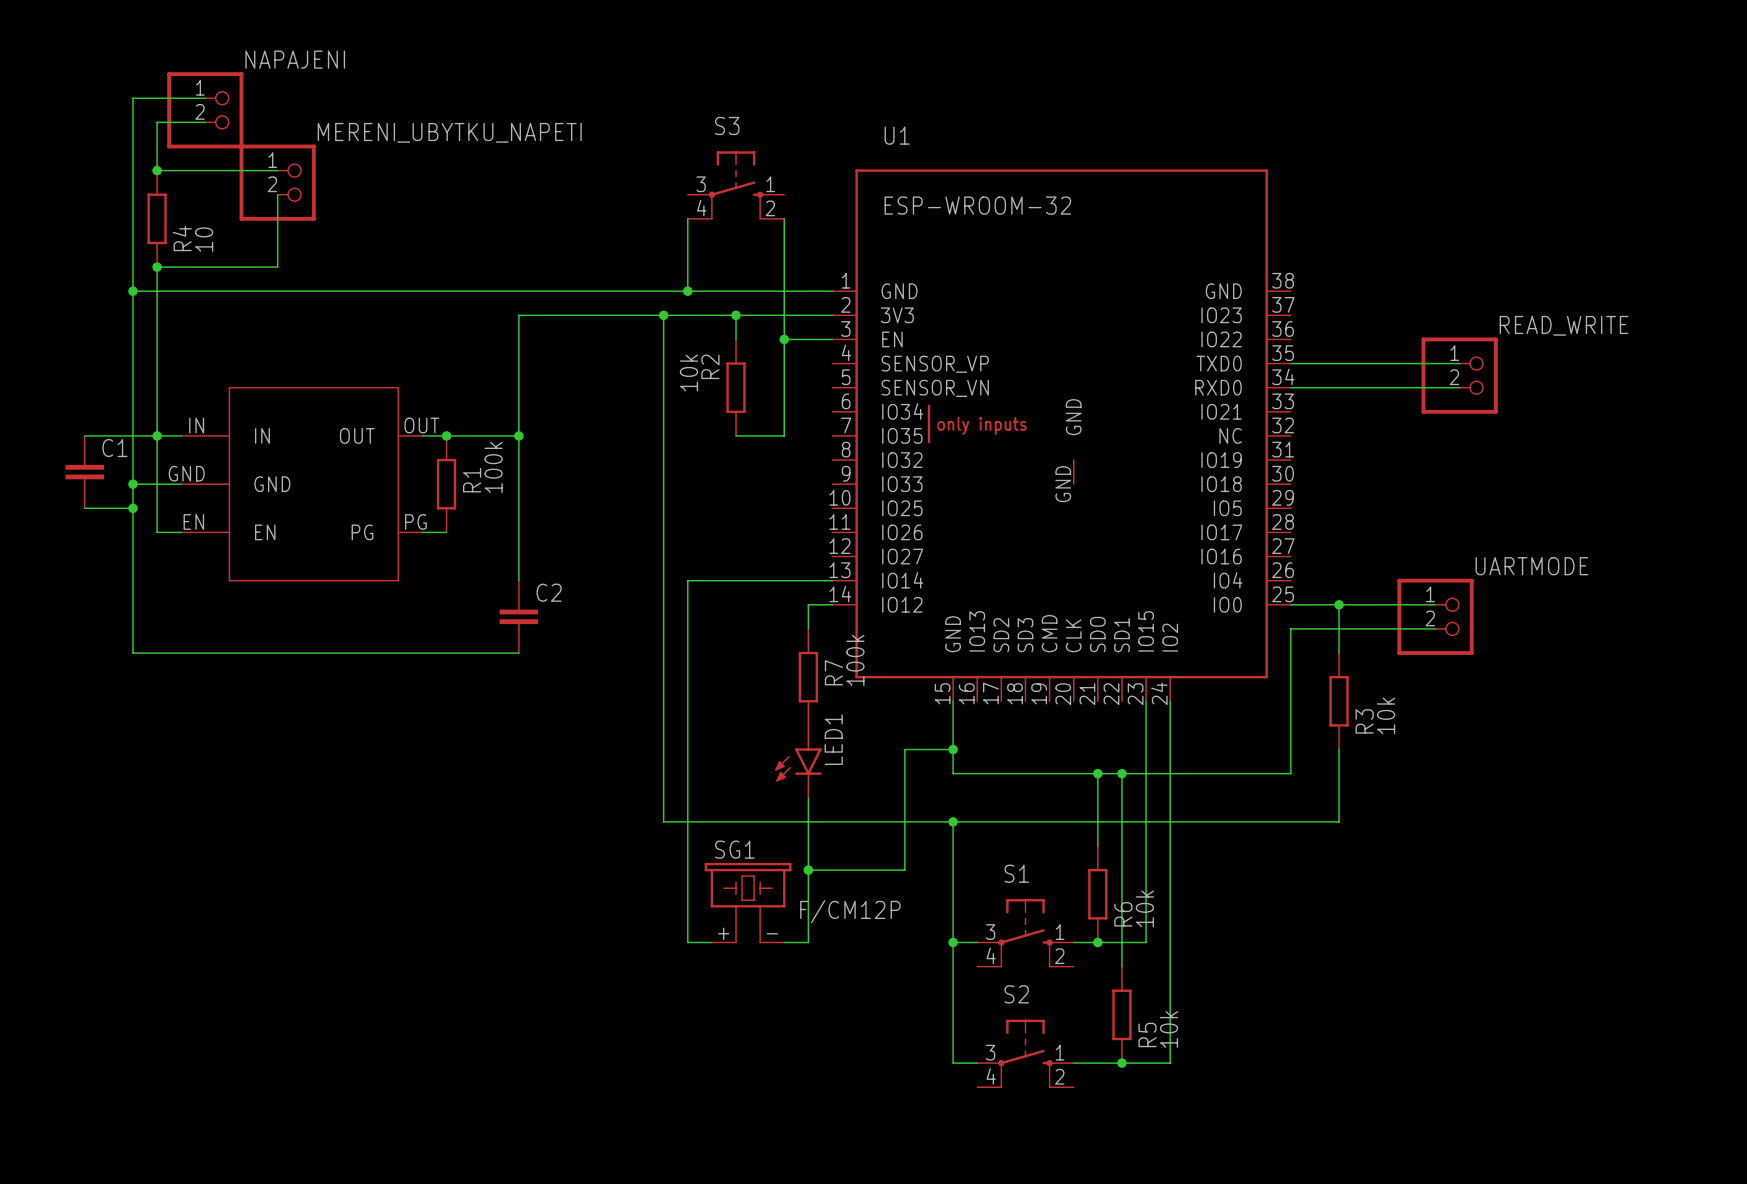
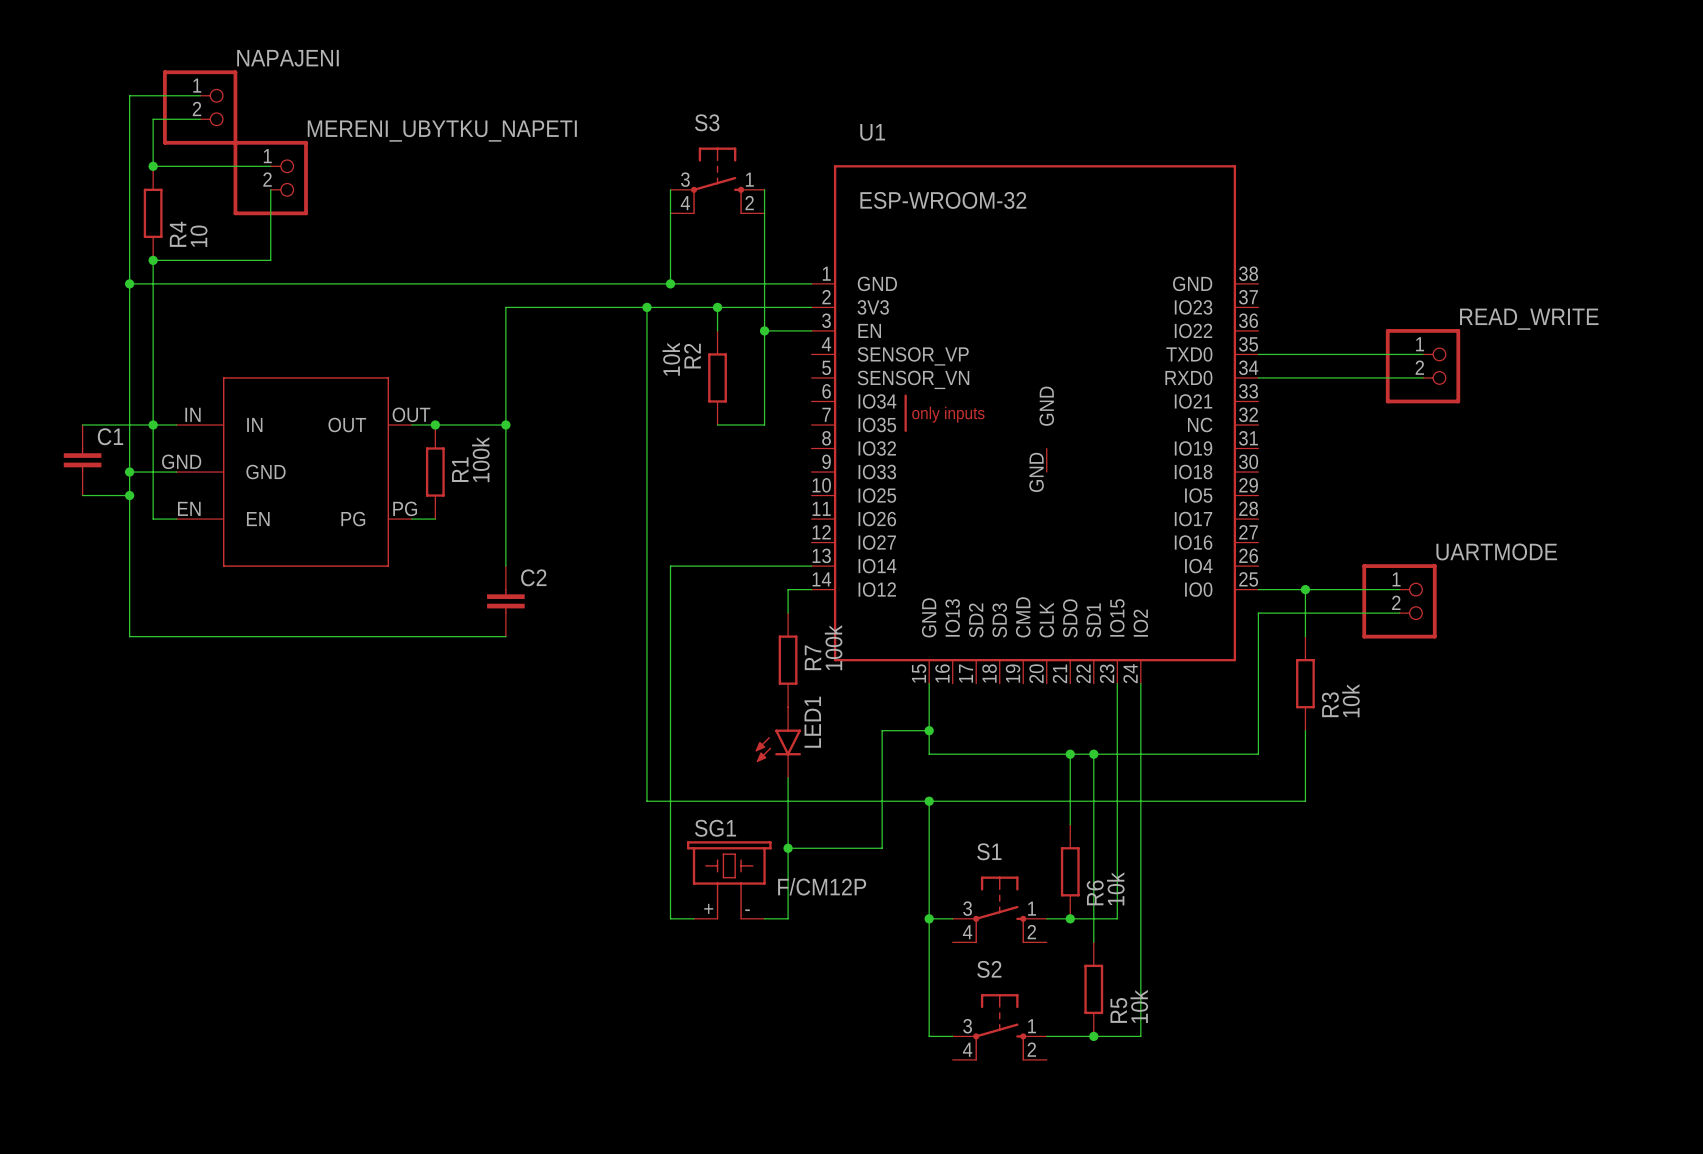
wire: none -> (670, 189) (670, 213)
wire: none -> (764, 189) (764, 213)

